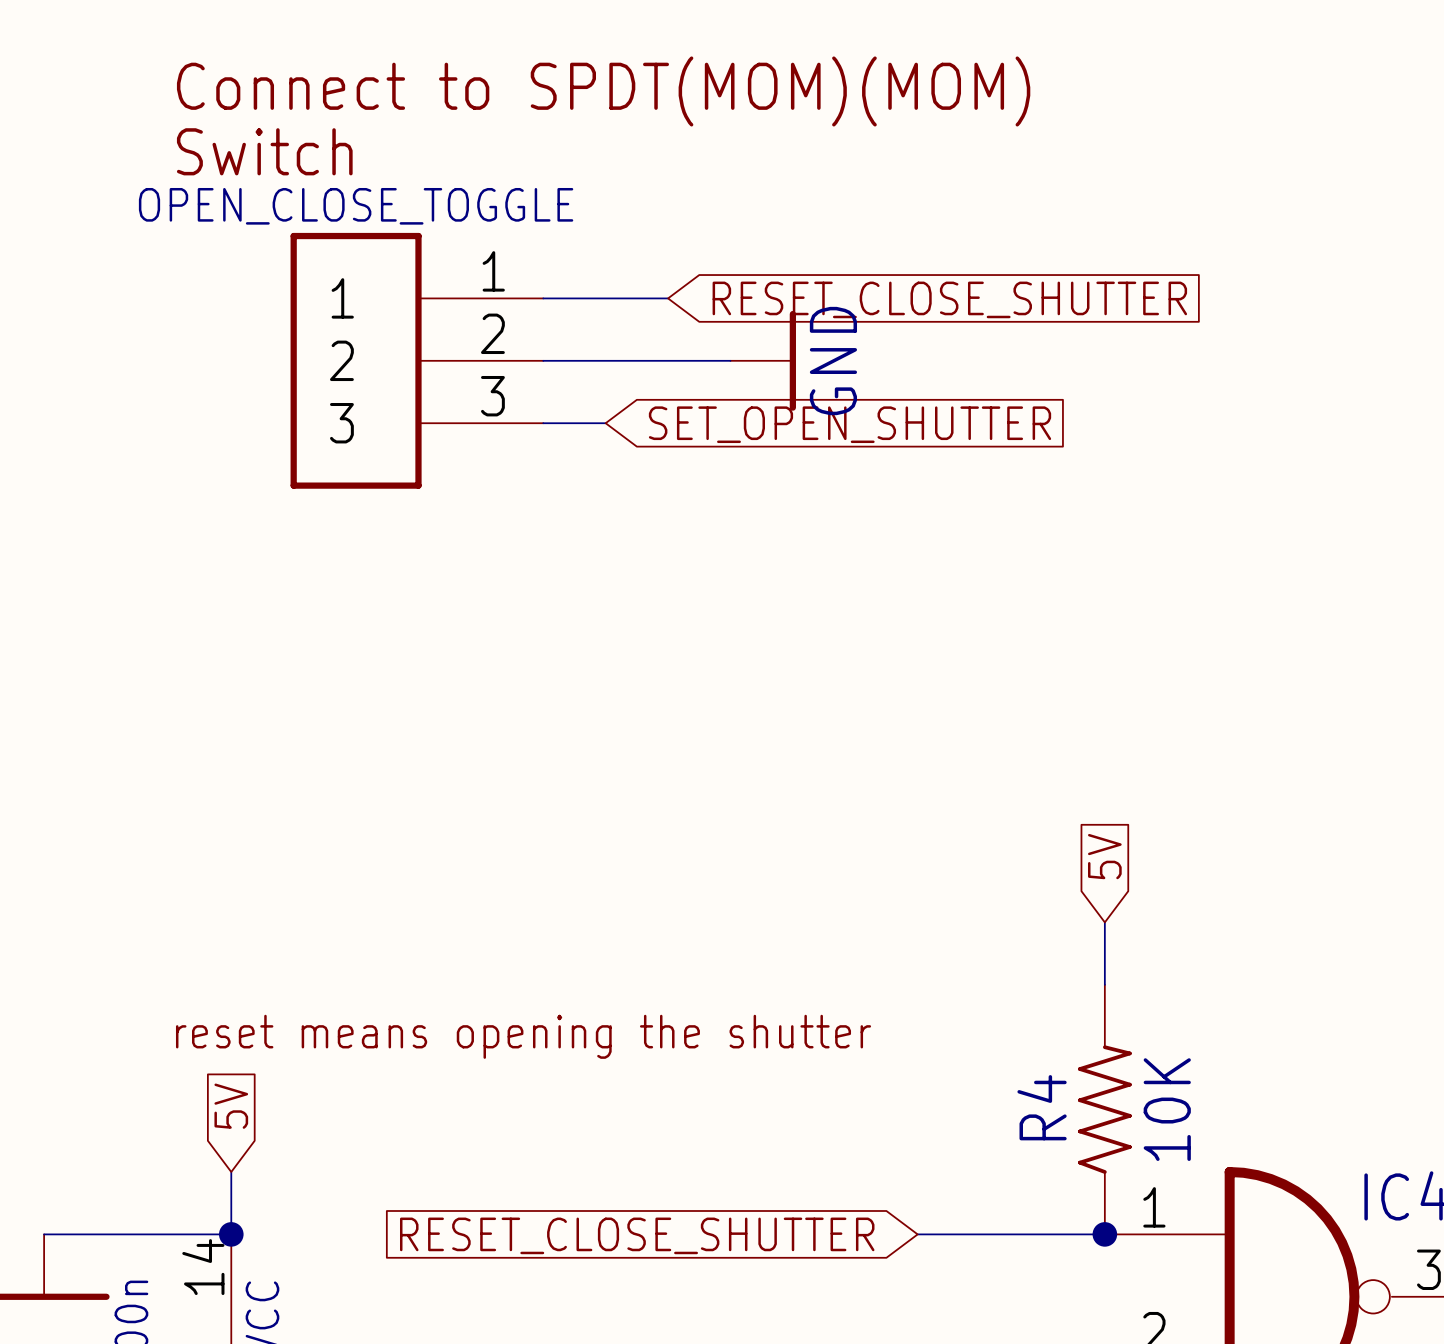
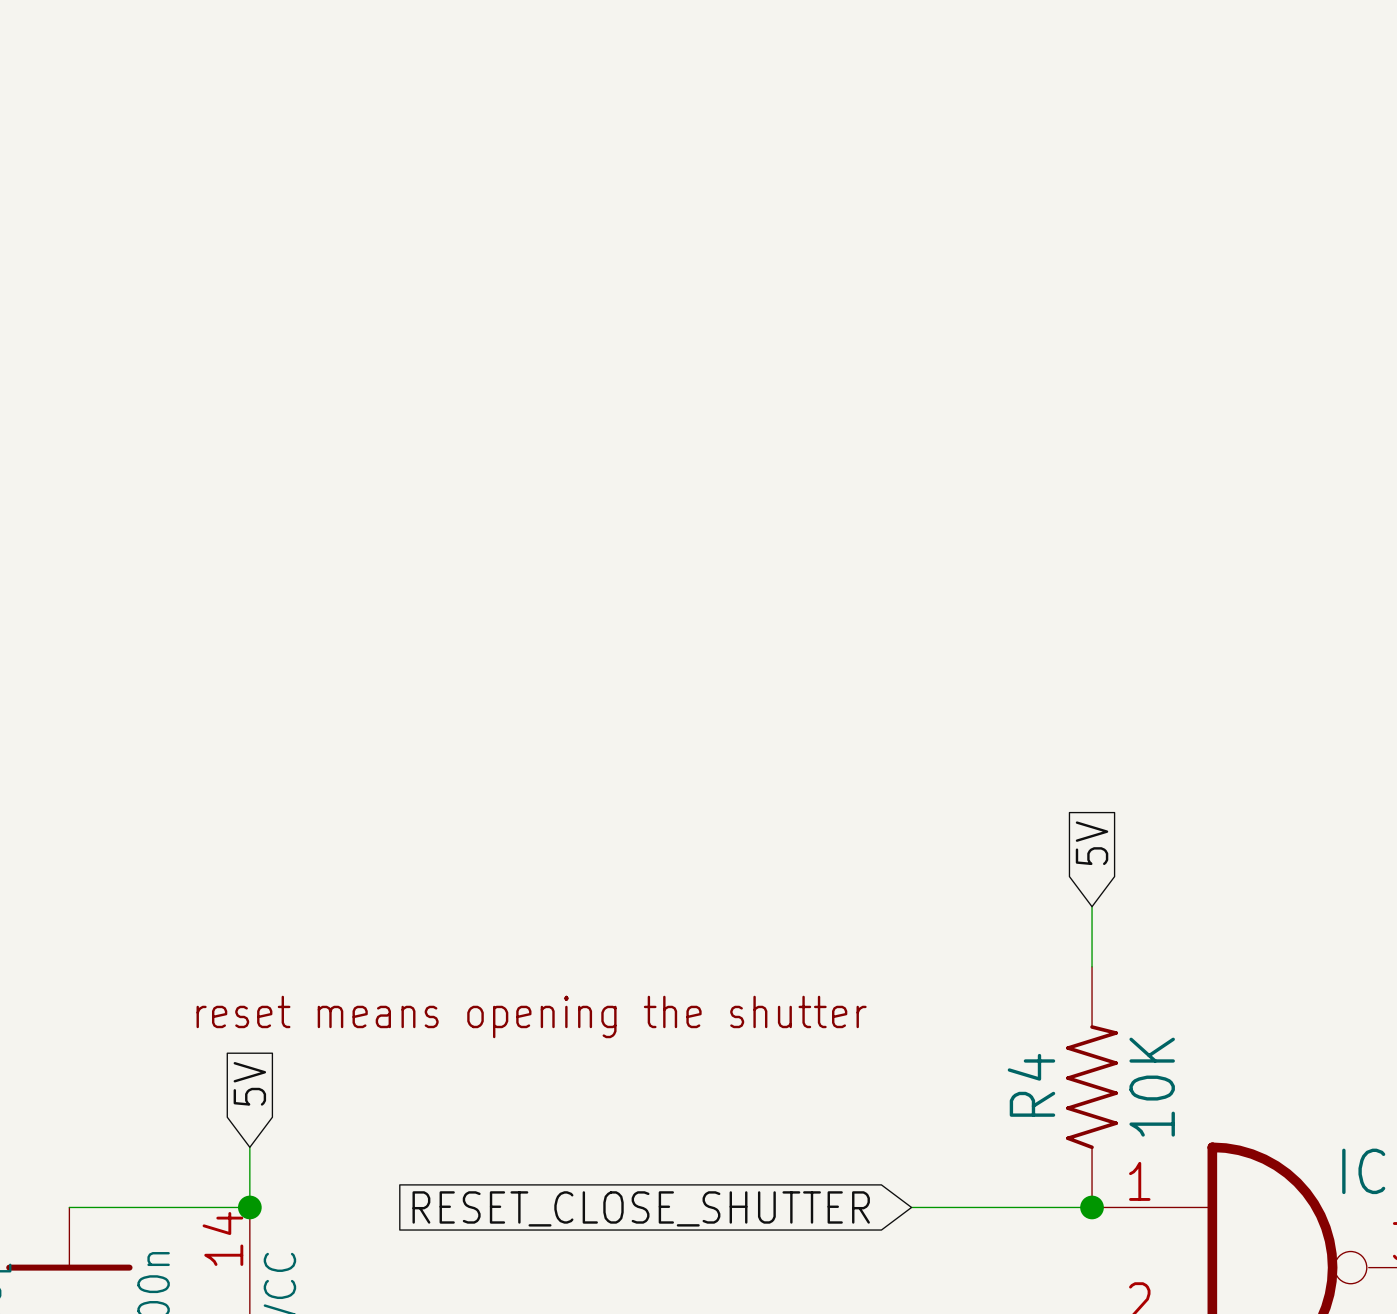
text: Connect to SPDT(MOM)(MOM) (603, 91) -> none
text: Switch (264, 151) -> none
wire: (543, 298) (668, 298) -> none
global label: RESET_CLOSE_SHUTTER (949, 299) -> none
OPEN_CLOSE_TOGGLE: (416, 360) -> none
wire: (543, 360) (730, 360) -> none
power symbol: GND (763, 360) -> none
wire: (543, 423) (605, 423) -> none
global label: SET_OPEN_SHUTTER (850, 424) -> none

